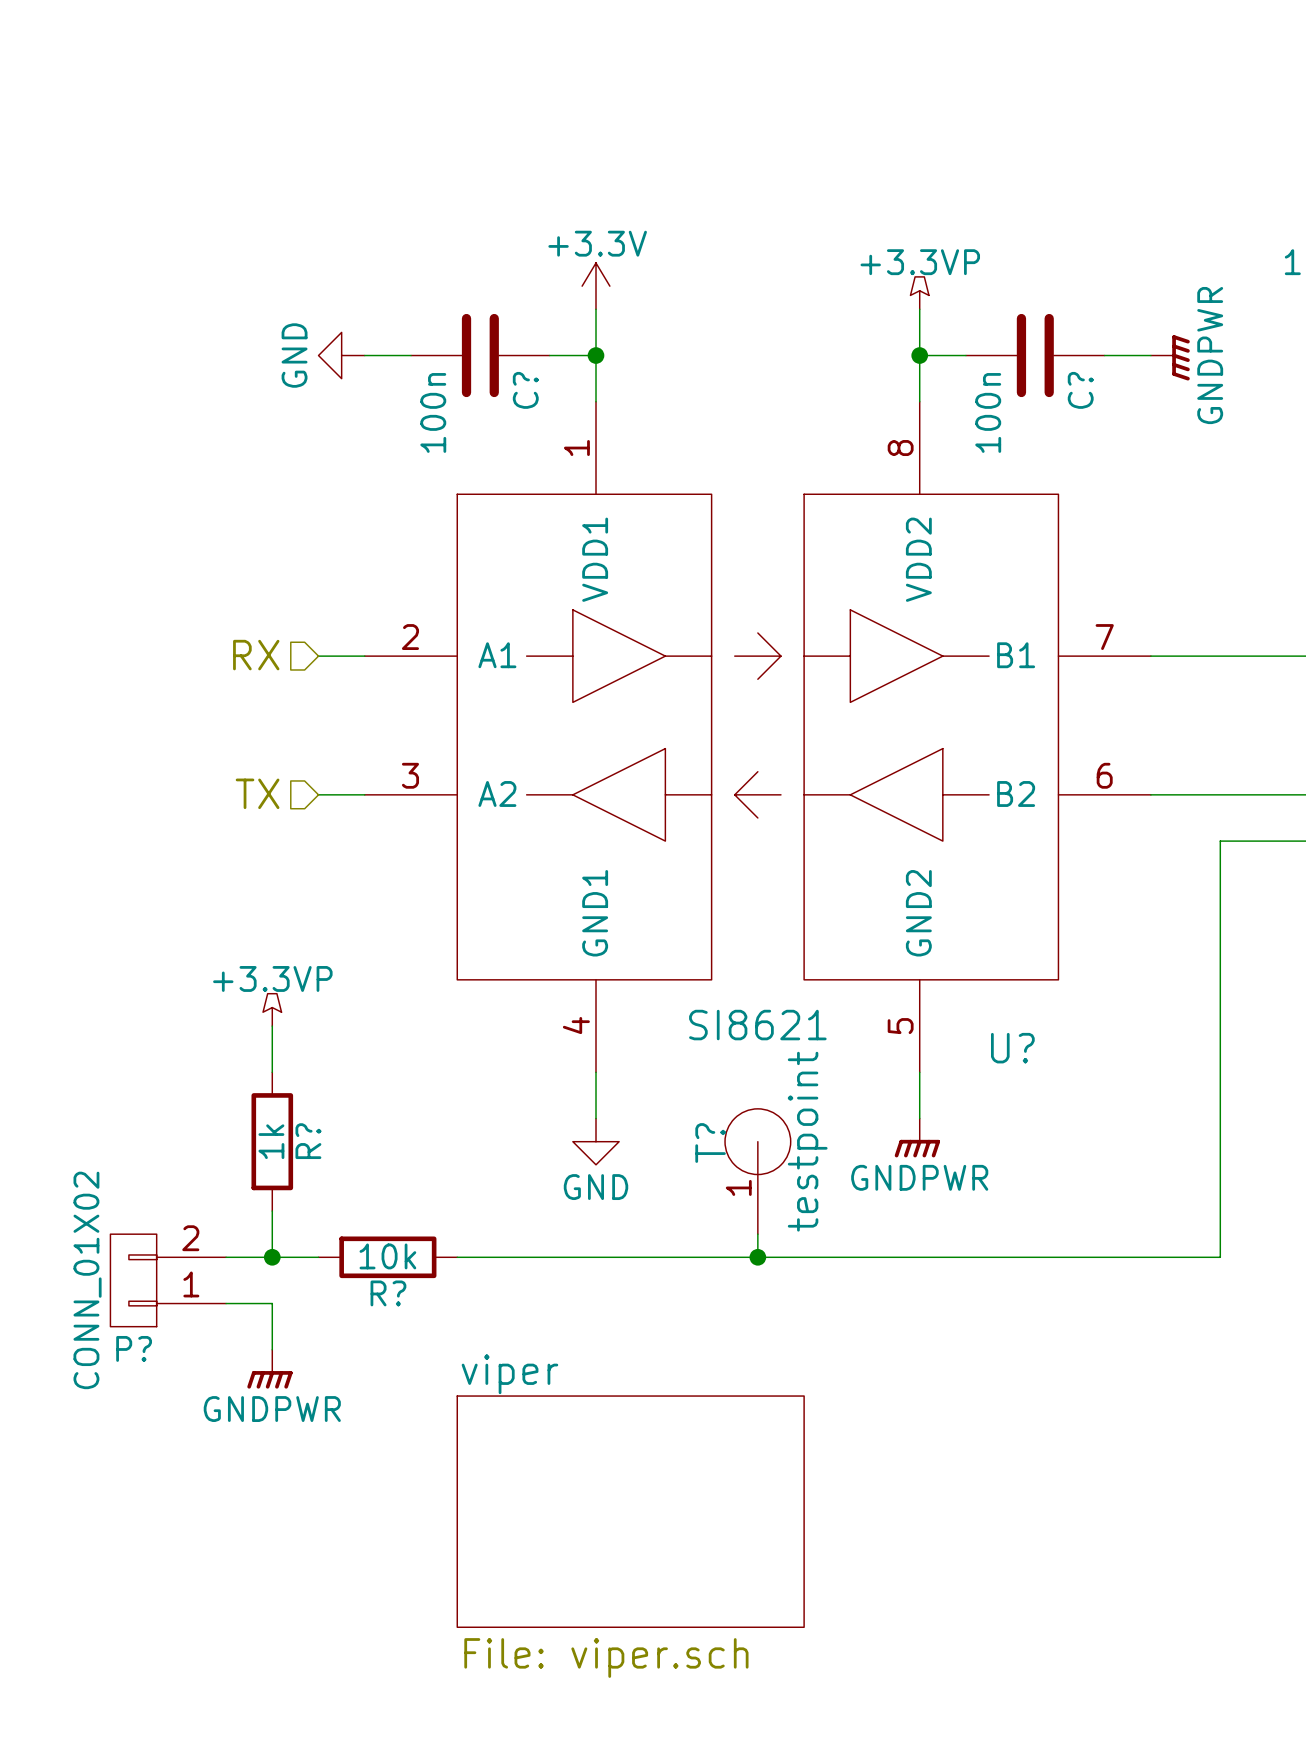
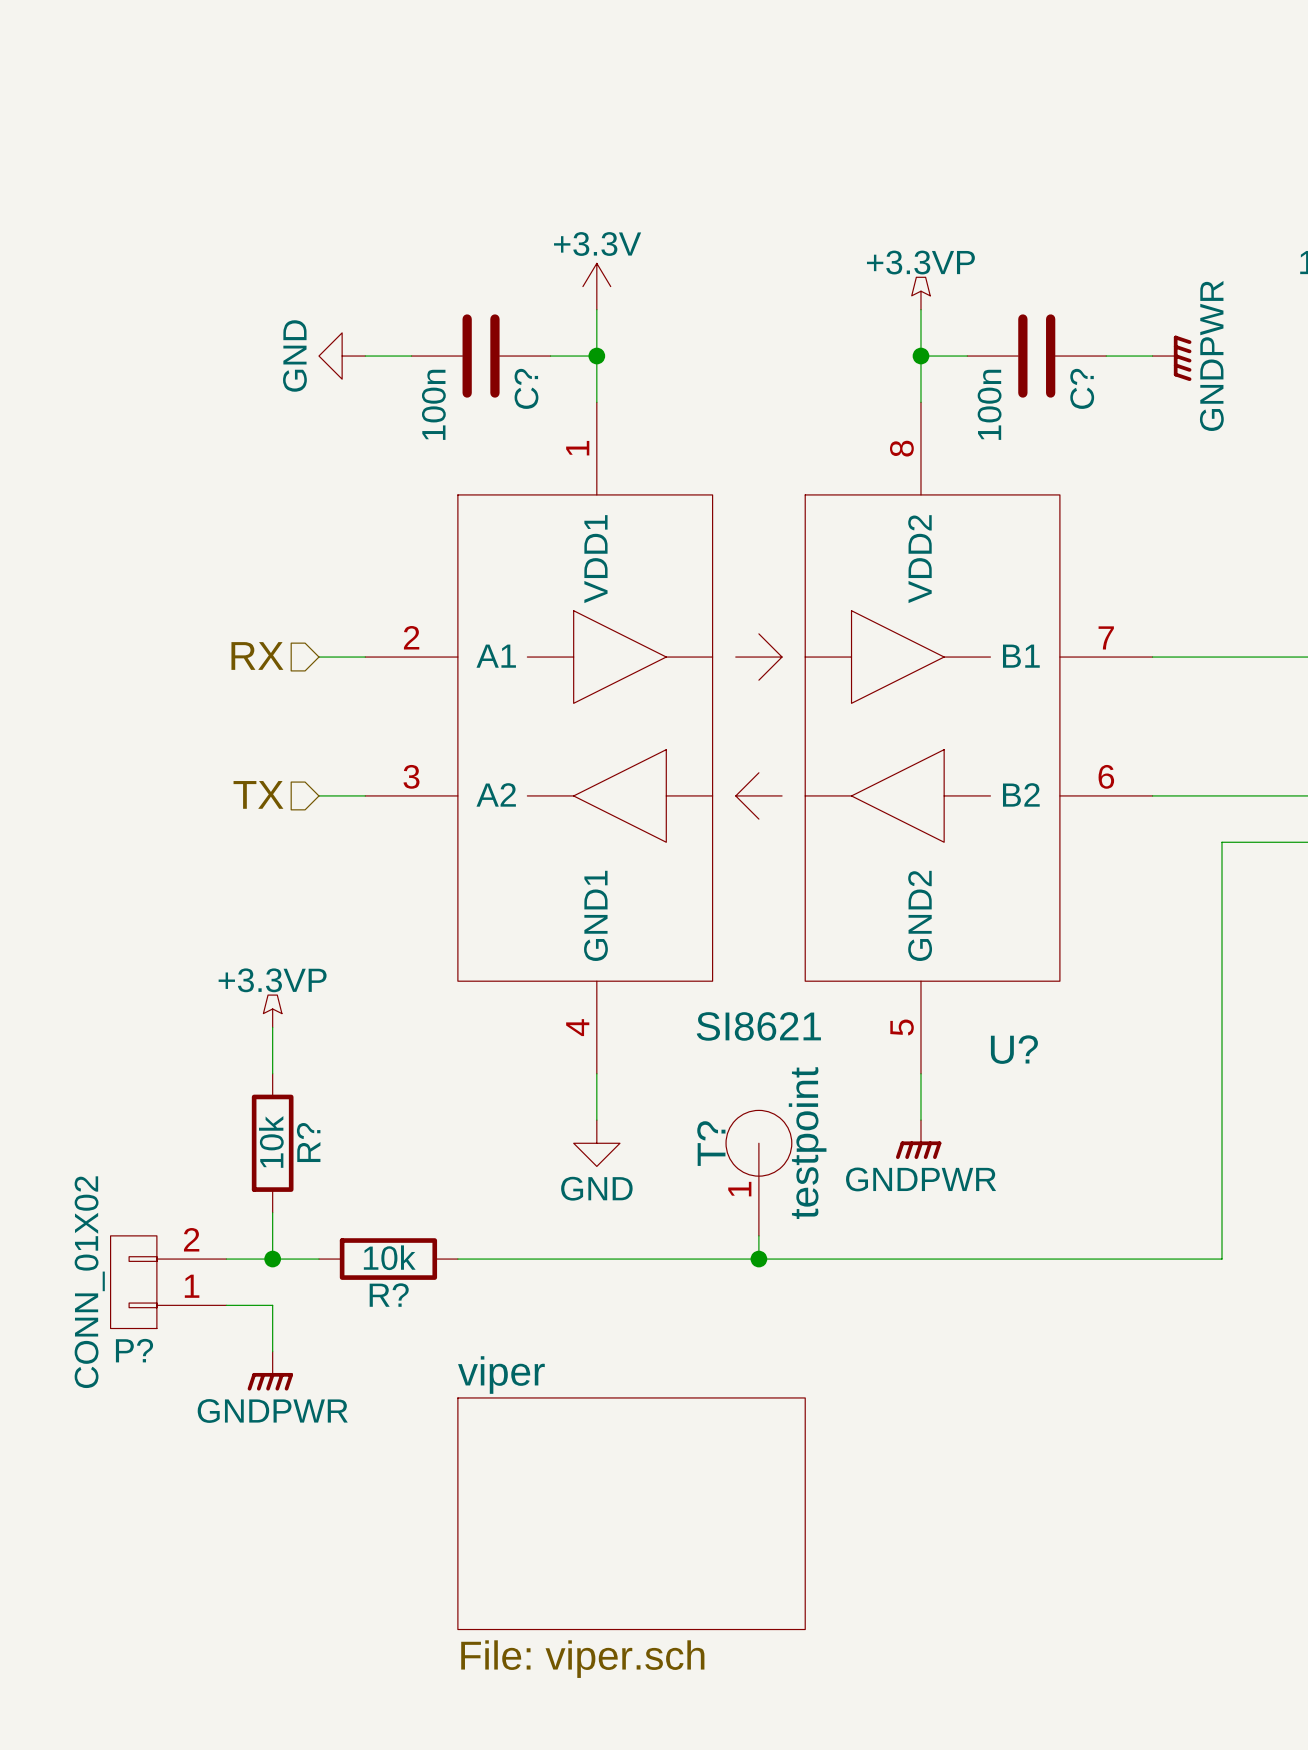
R? value: 1k (271, 1141) -> 10k (271, 1141)

